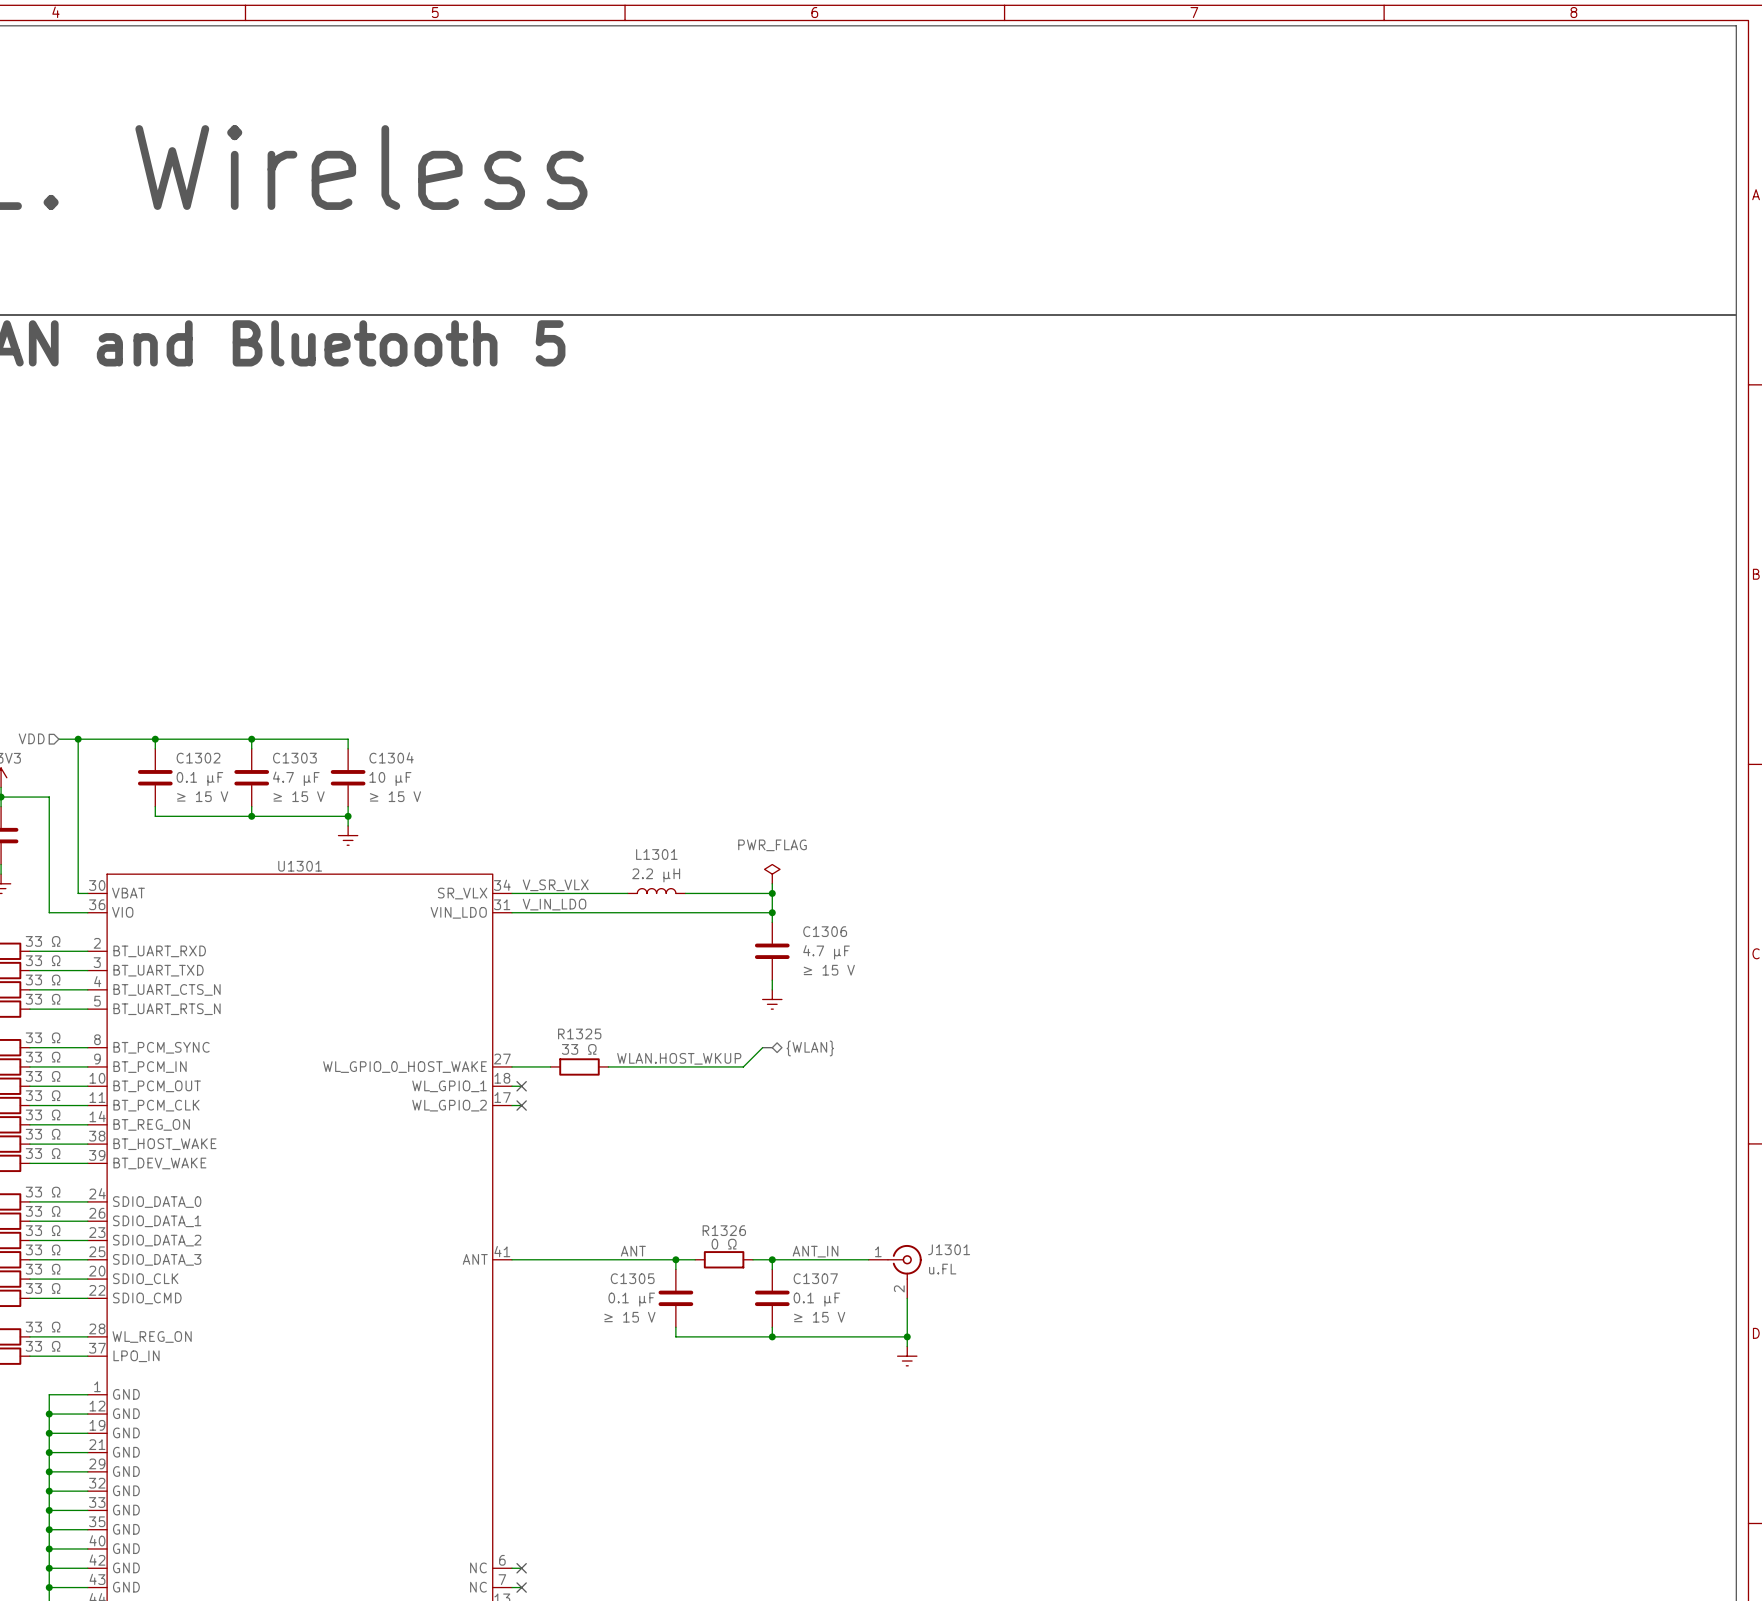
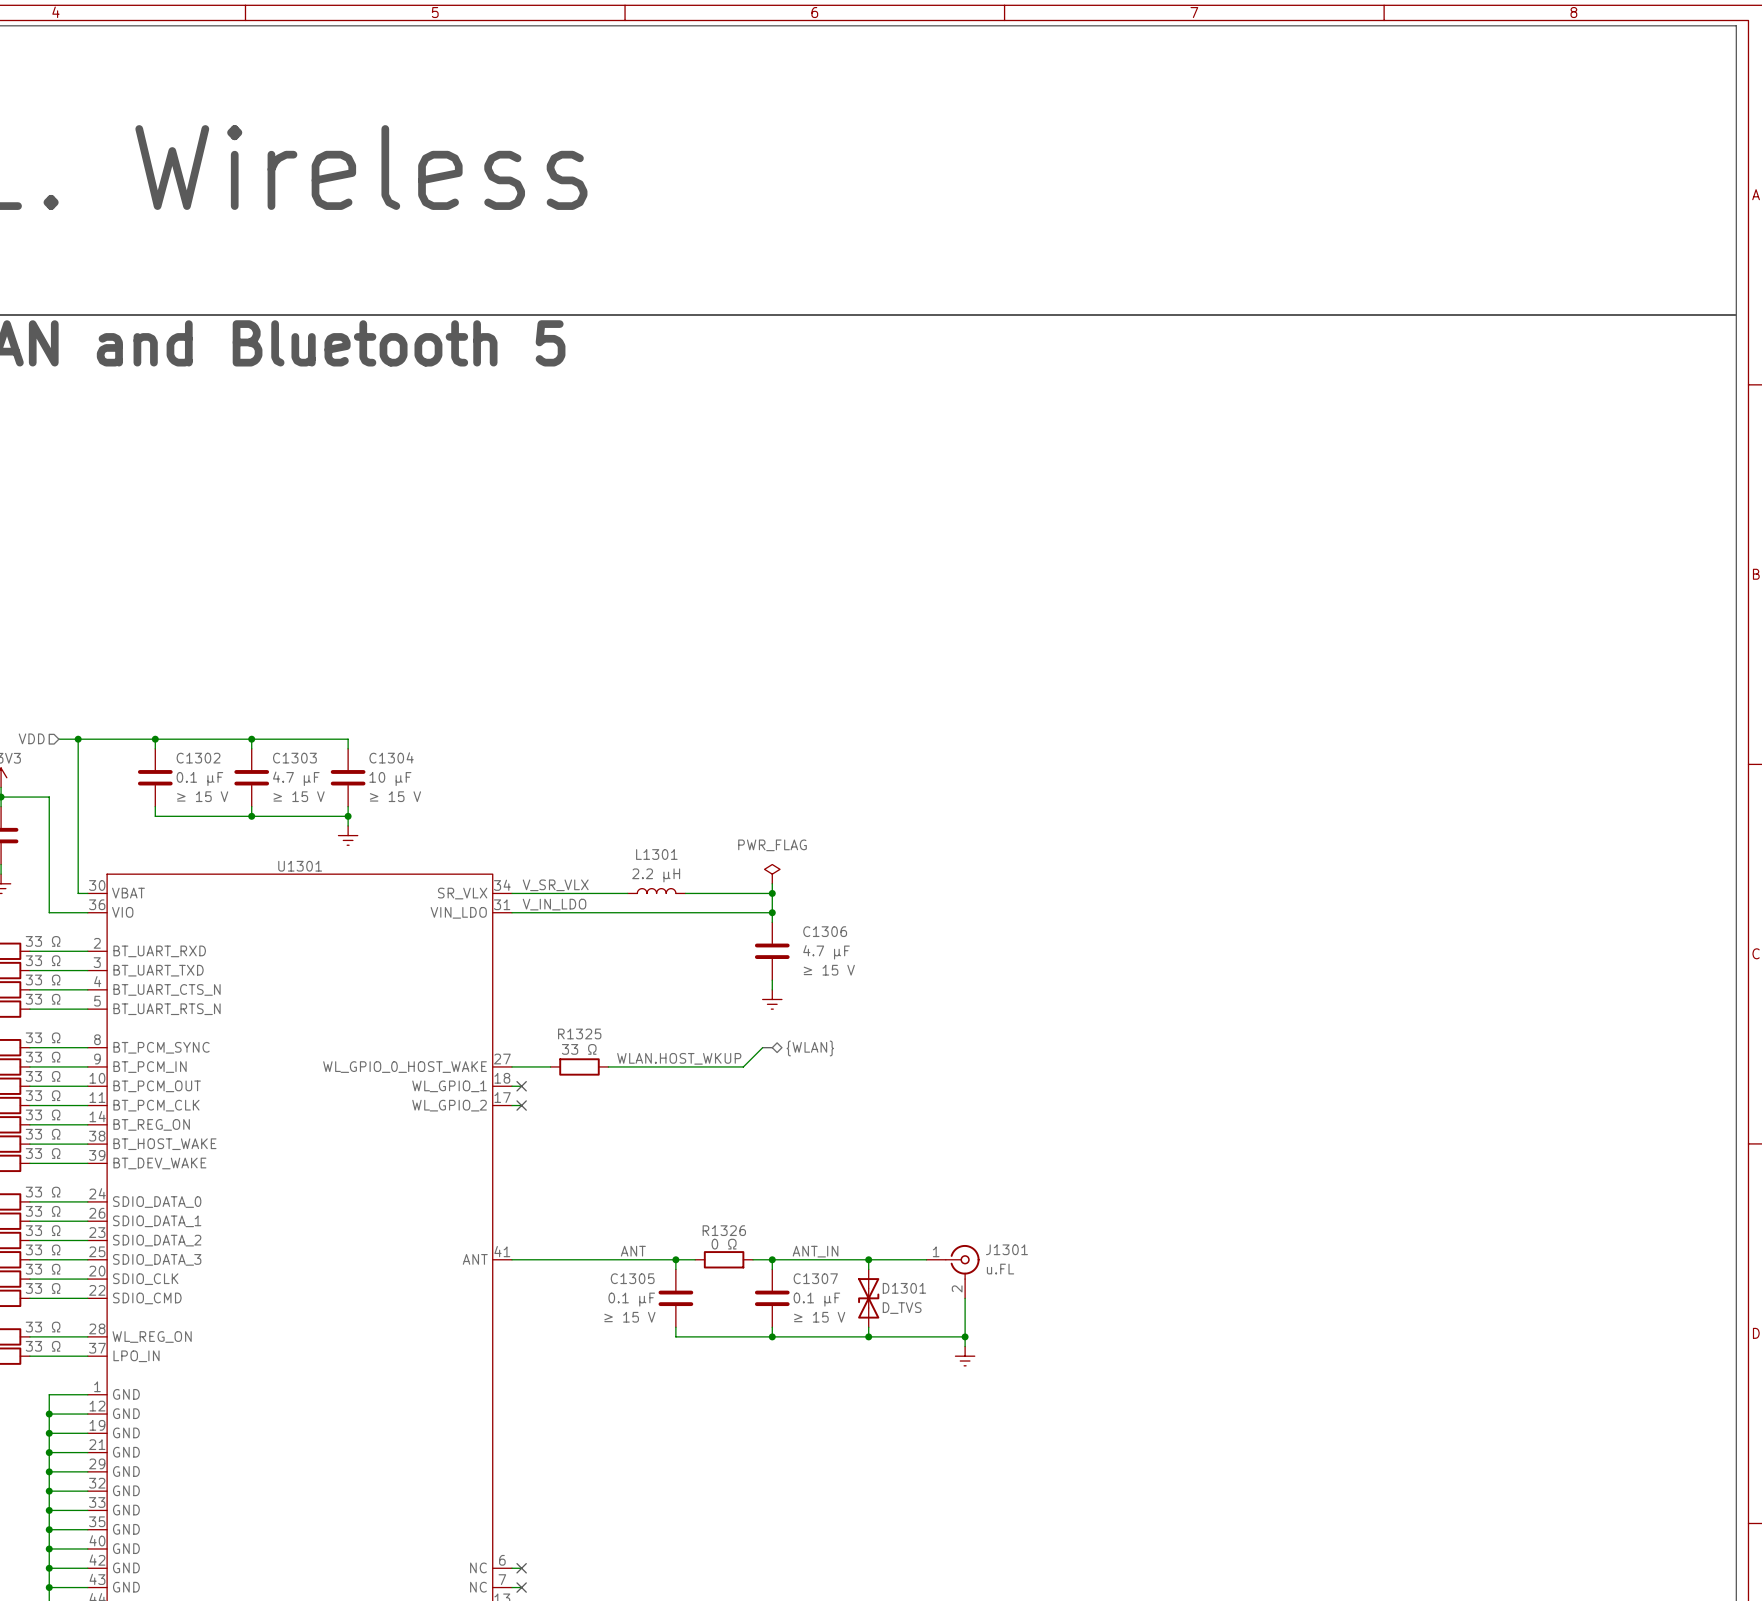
junction: none -> (868, 1259)
J1301 position: (895, 1271) -> (953, 1271)
D1301: none -> D_TVS (868, 1298)
wire: (907, 1298) (907, 1346) -> (965, 1298) (965, 1346)
wire: none -> (868, 1327) (868, 1336)
junction: none -> (868, 1336)
wire: none -> (907, 1336) (965, 1336)
junction: (907, 1336) -> none
junction: none -> (965, 1336)
power symbol position: (907, 1356) -> (965, 1356)

